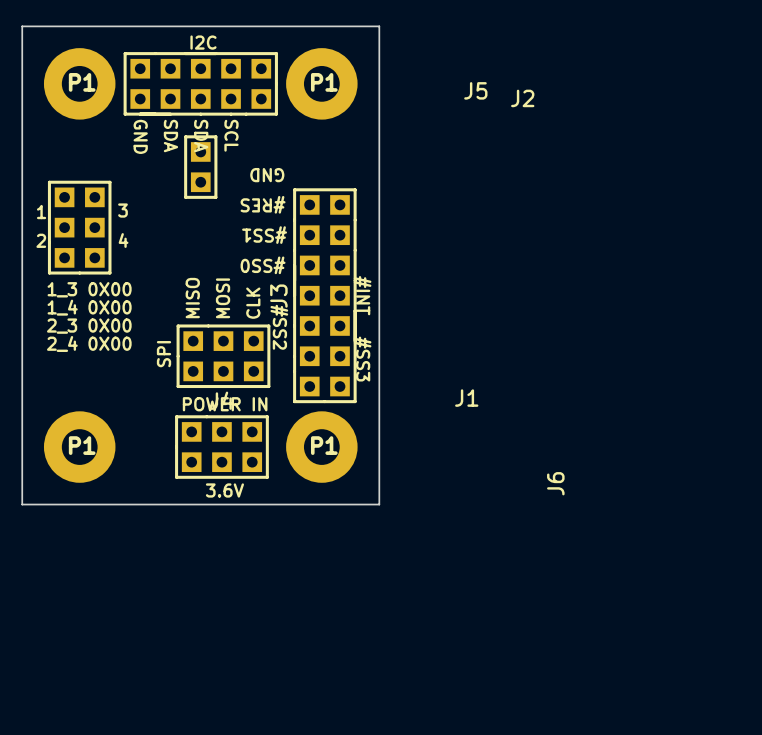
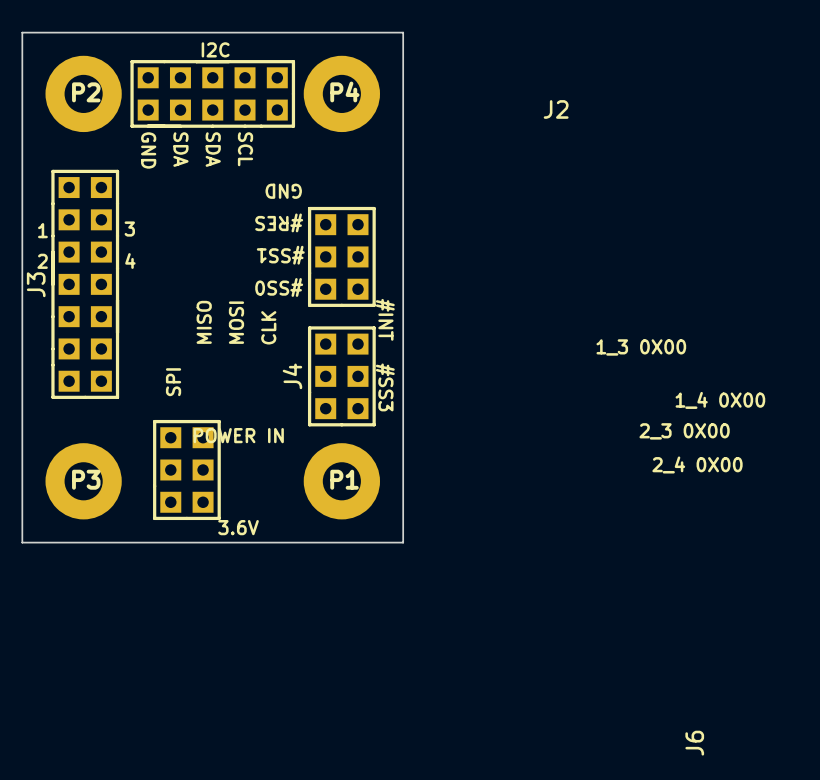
P1 name: P1 (82, 82) -> P2 (86, 92)
P1 name: P1 (324, 82) -> P4 (344, 91)
J5: (200, 167) -> none
J6 position: (79, 227) -> (186, 469)
part: none -> (341, 256)
text: 1_3 0X00 (89, 289) -> none
J3 position: (324, 295) -> (85, 284)
text: 1_4 0X00 (89, 307) -> none
text: none -> 1_3 0X00 (641, 347)
text: 2_3 0X00 (89, 326) -> none
text: #SS2 (279, 327) -> none
text: 2_4 0X00 (89, 343) -> none
J1: (223, 356) -> none
text: none -> 1_4 0X00 (720, 400)
text: none -> 2_3 0X00 (684, 431)
text: none -> 2_4 0X00 (697, 464)
P1 name: P1 (82, 445) -> P3 (86, 479)
J4 rotation: 0° (221, 447) -> 90° counterclockwise (341, 376)
J4 position: (221, 447) -> (341, 376)

